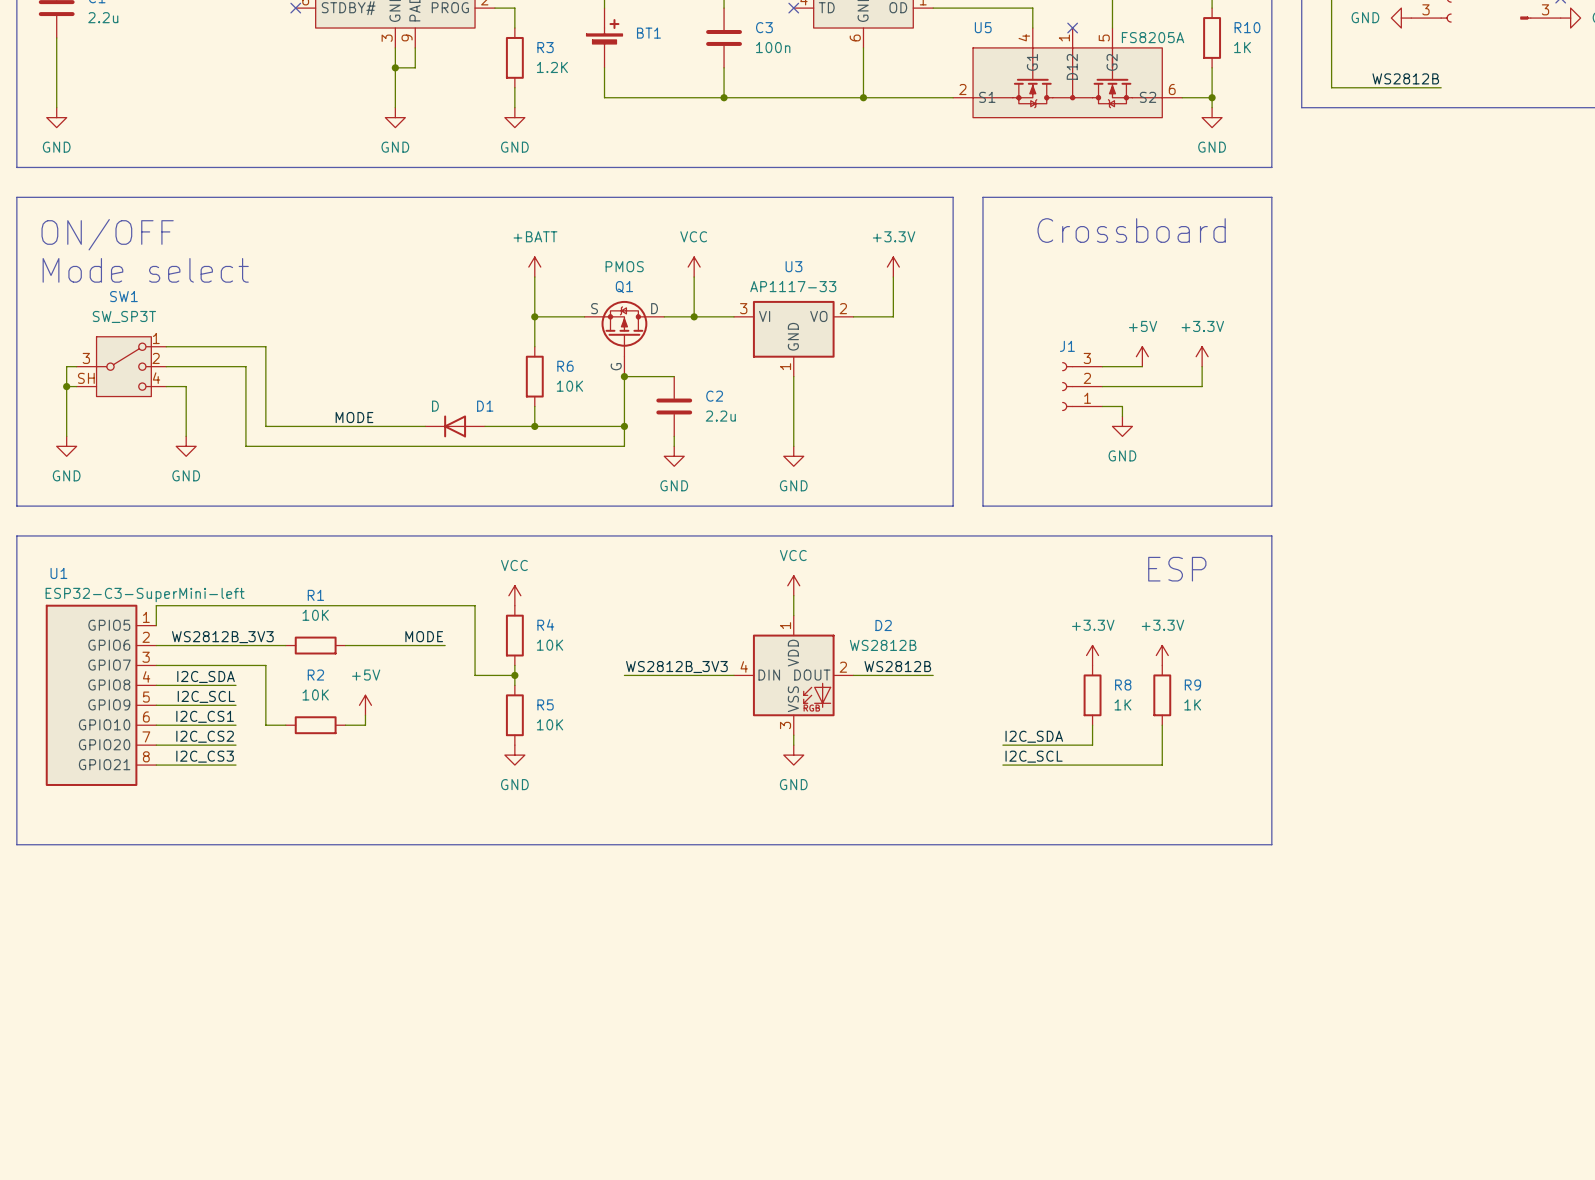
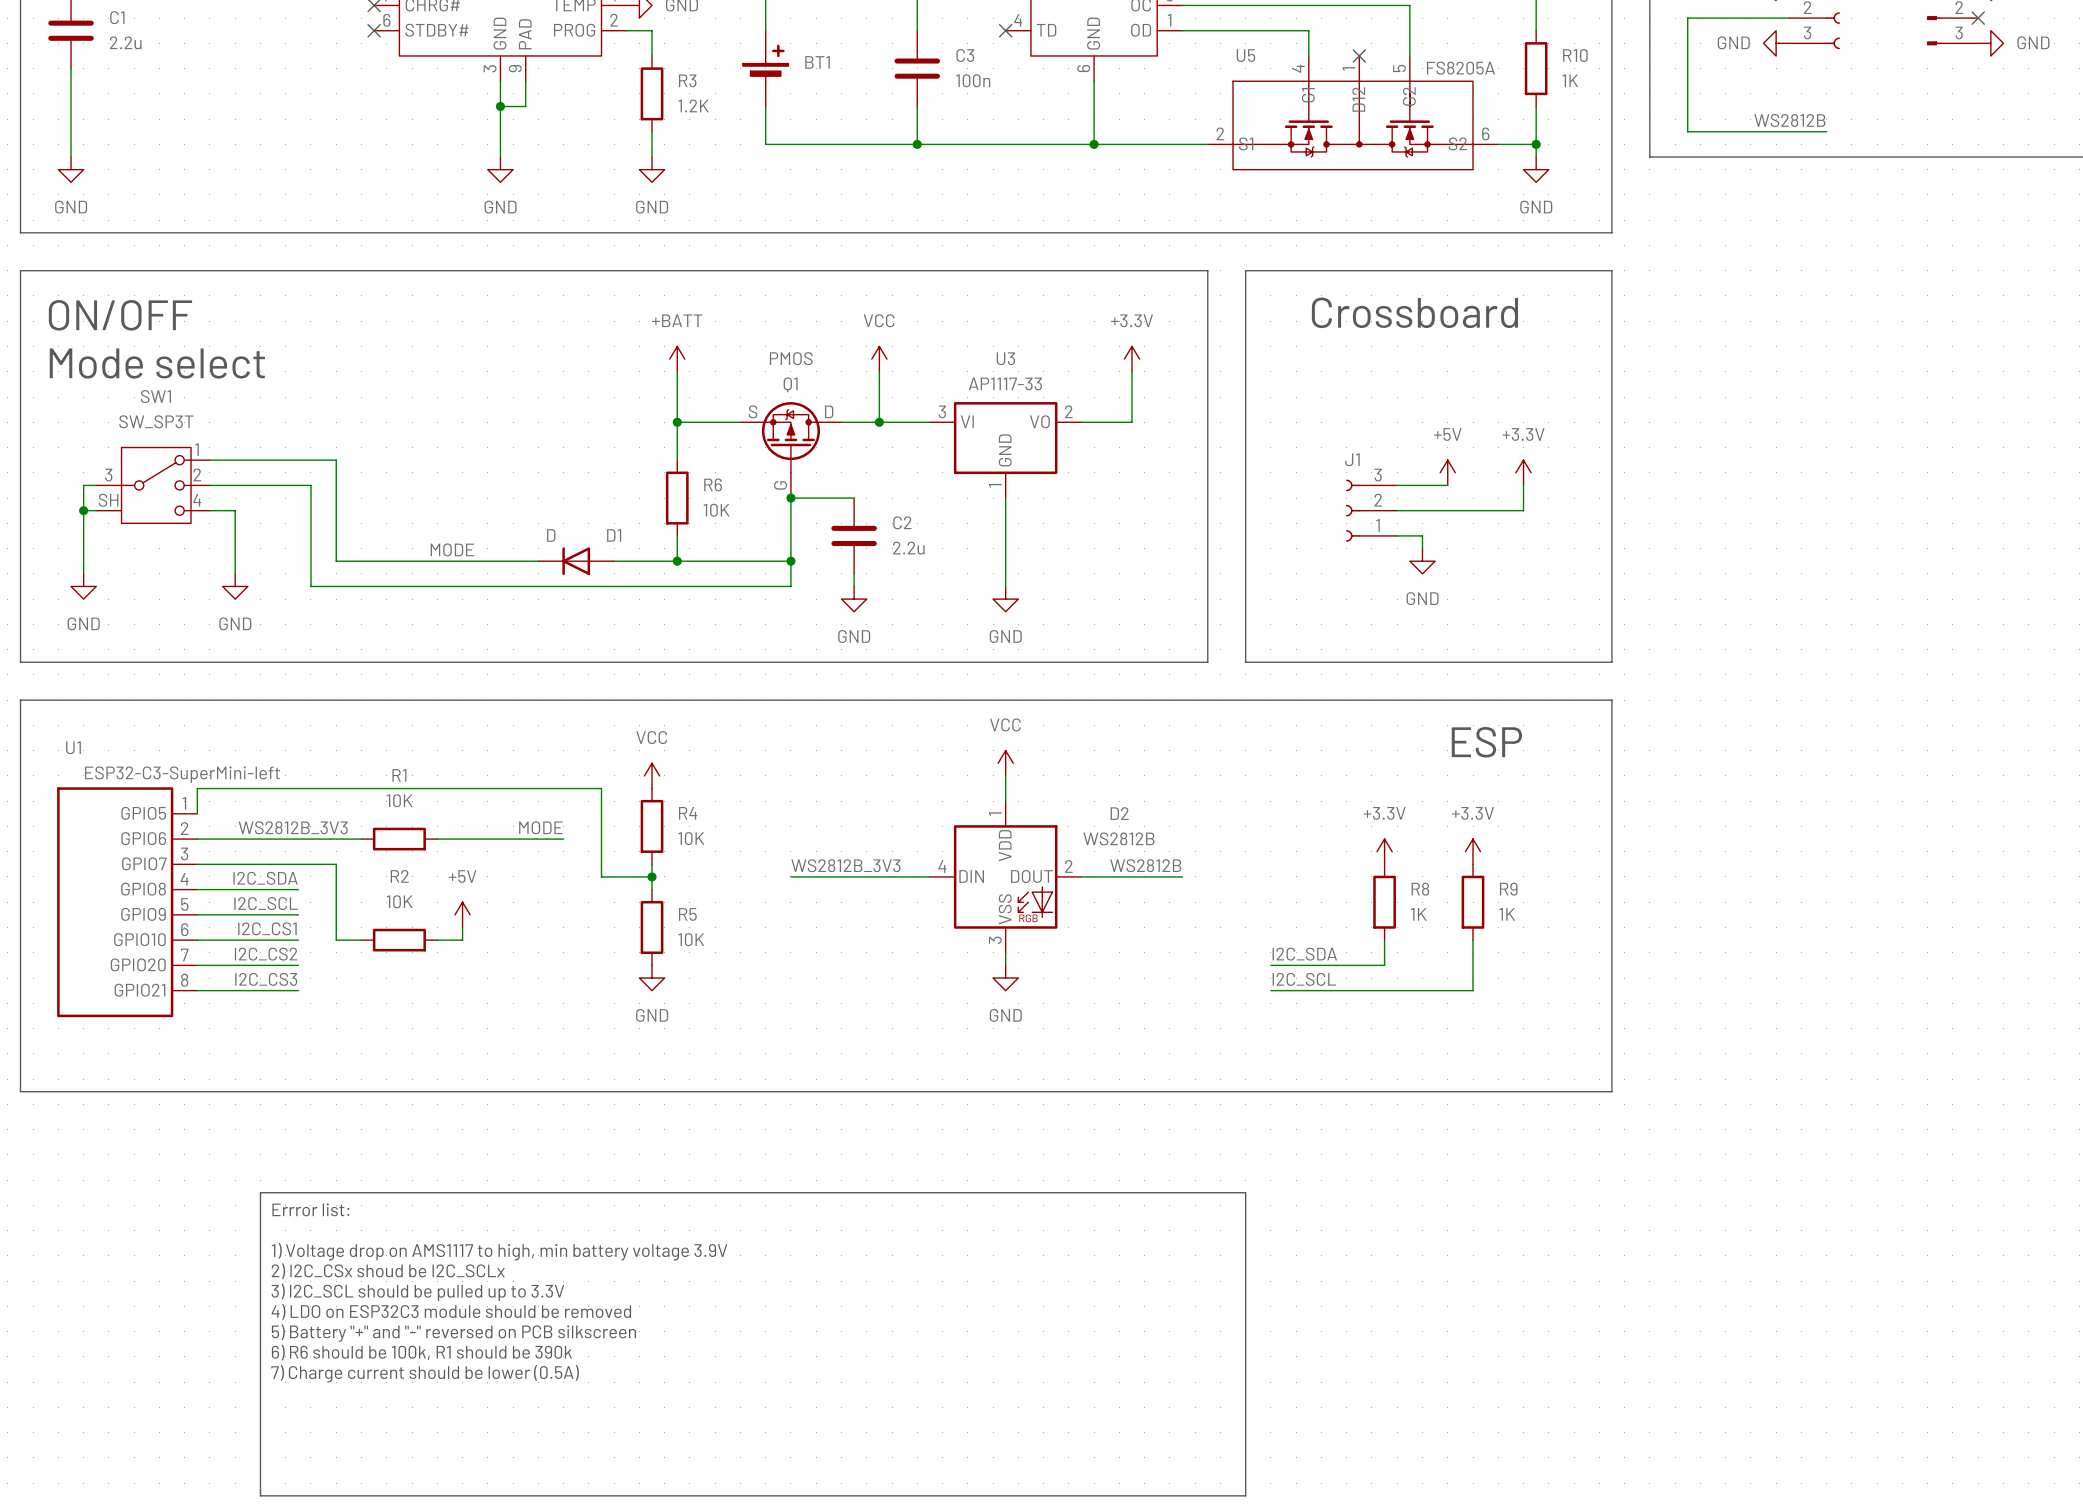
line: none -> (260, 1192) (1245, 1192) (1245, 1495) (260, 1495) (260, 1192)
text: none -> Errror list: (310, 1209)
text: none -> 1) Voltage drop on AMS1117 to high, min battery voltage 3.9V (499, 1251)
text: none -> 2) I2C_CSx shoud be I2C_SCLx (388, 1271)
text: none -> 3) I2C_SCL should be pulled up to 3.3V (417, 1292)
text: none -> 4) LDO on ESP32C3 module should be removed (451, 1311)
text: none -> 5) Battery "+" and "-" reversed on PCB silkscreen (453, 1333)
text: none -> 6) R6 should be 100k, R1 should be 390k (421, 1352)
text: none -> 7) Charge current should be lower (0.5A) (425, 1373)

